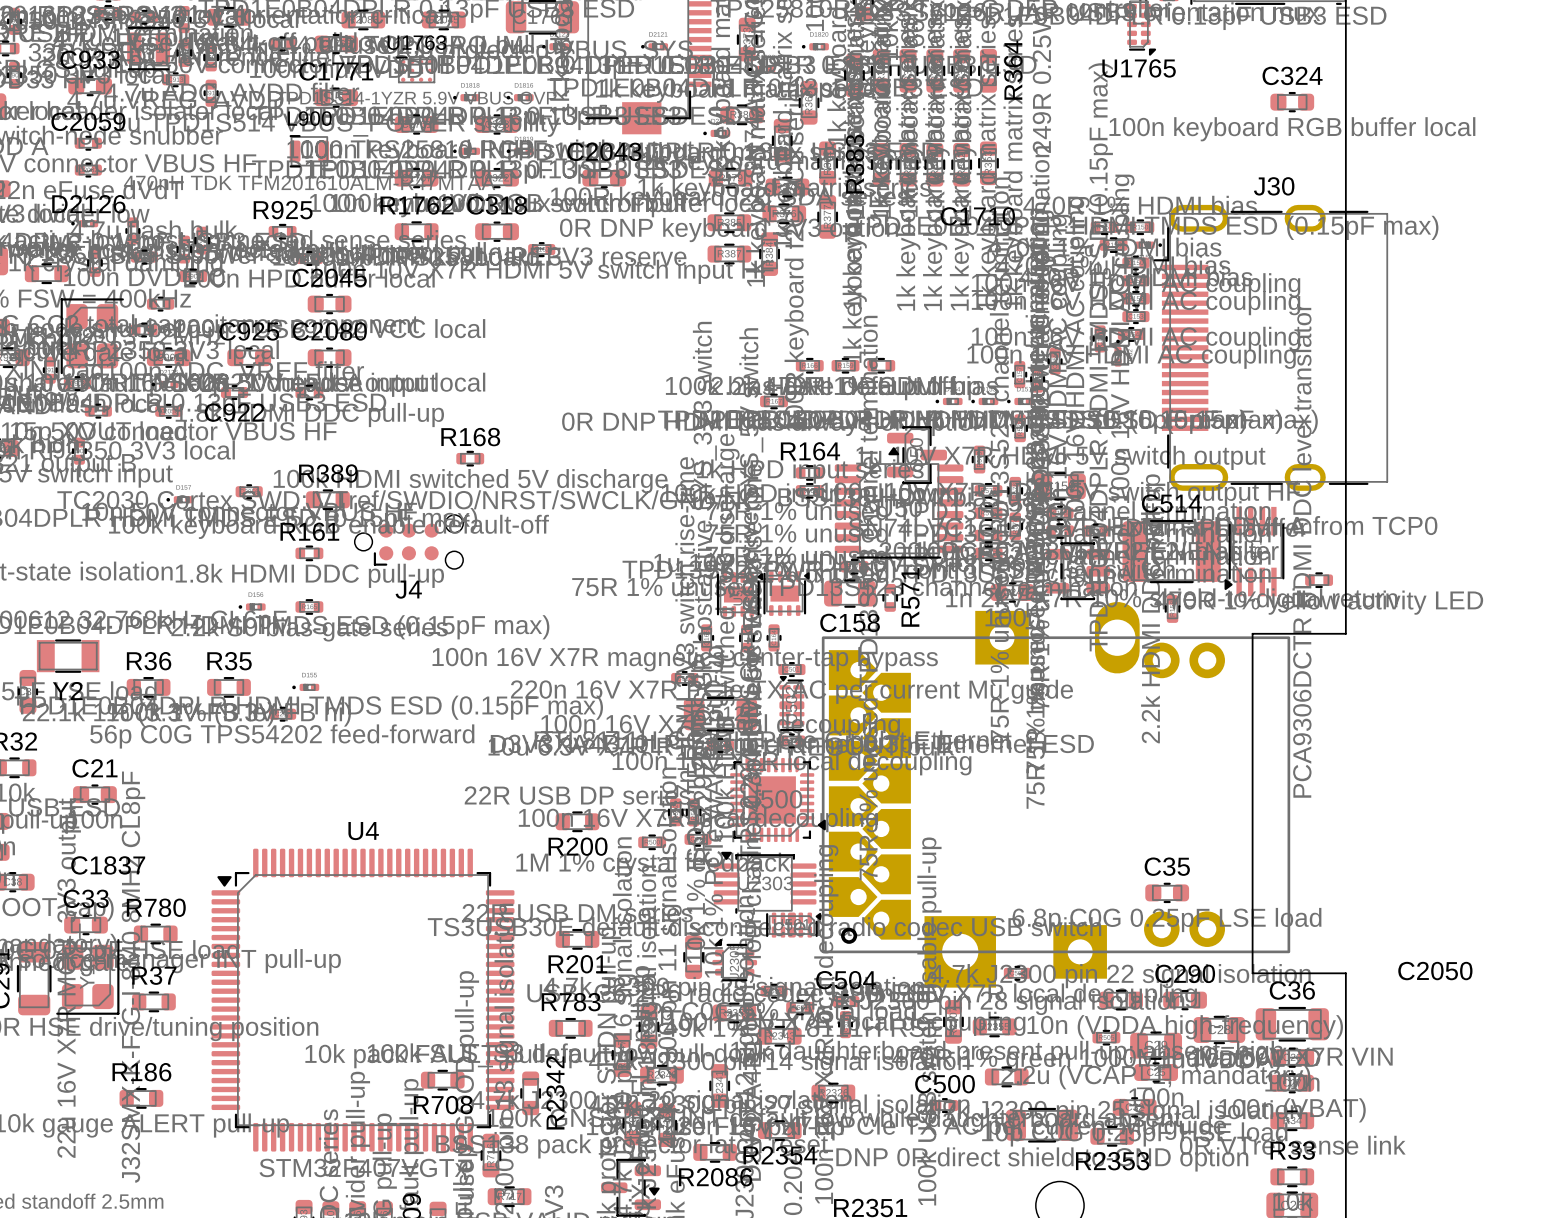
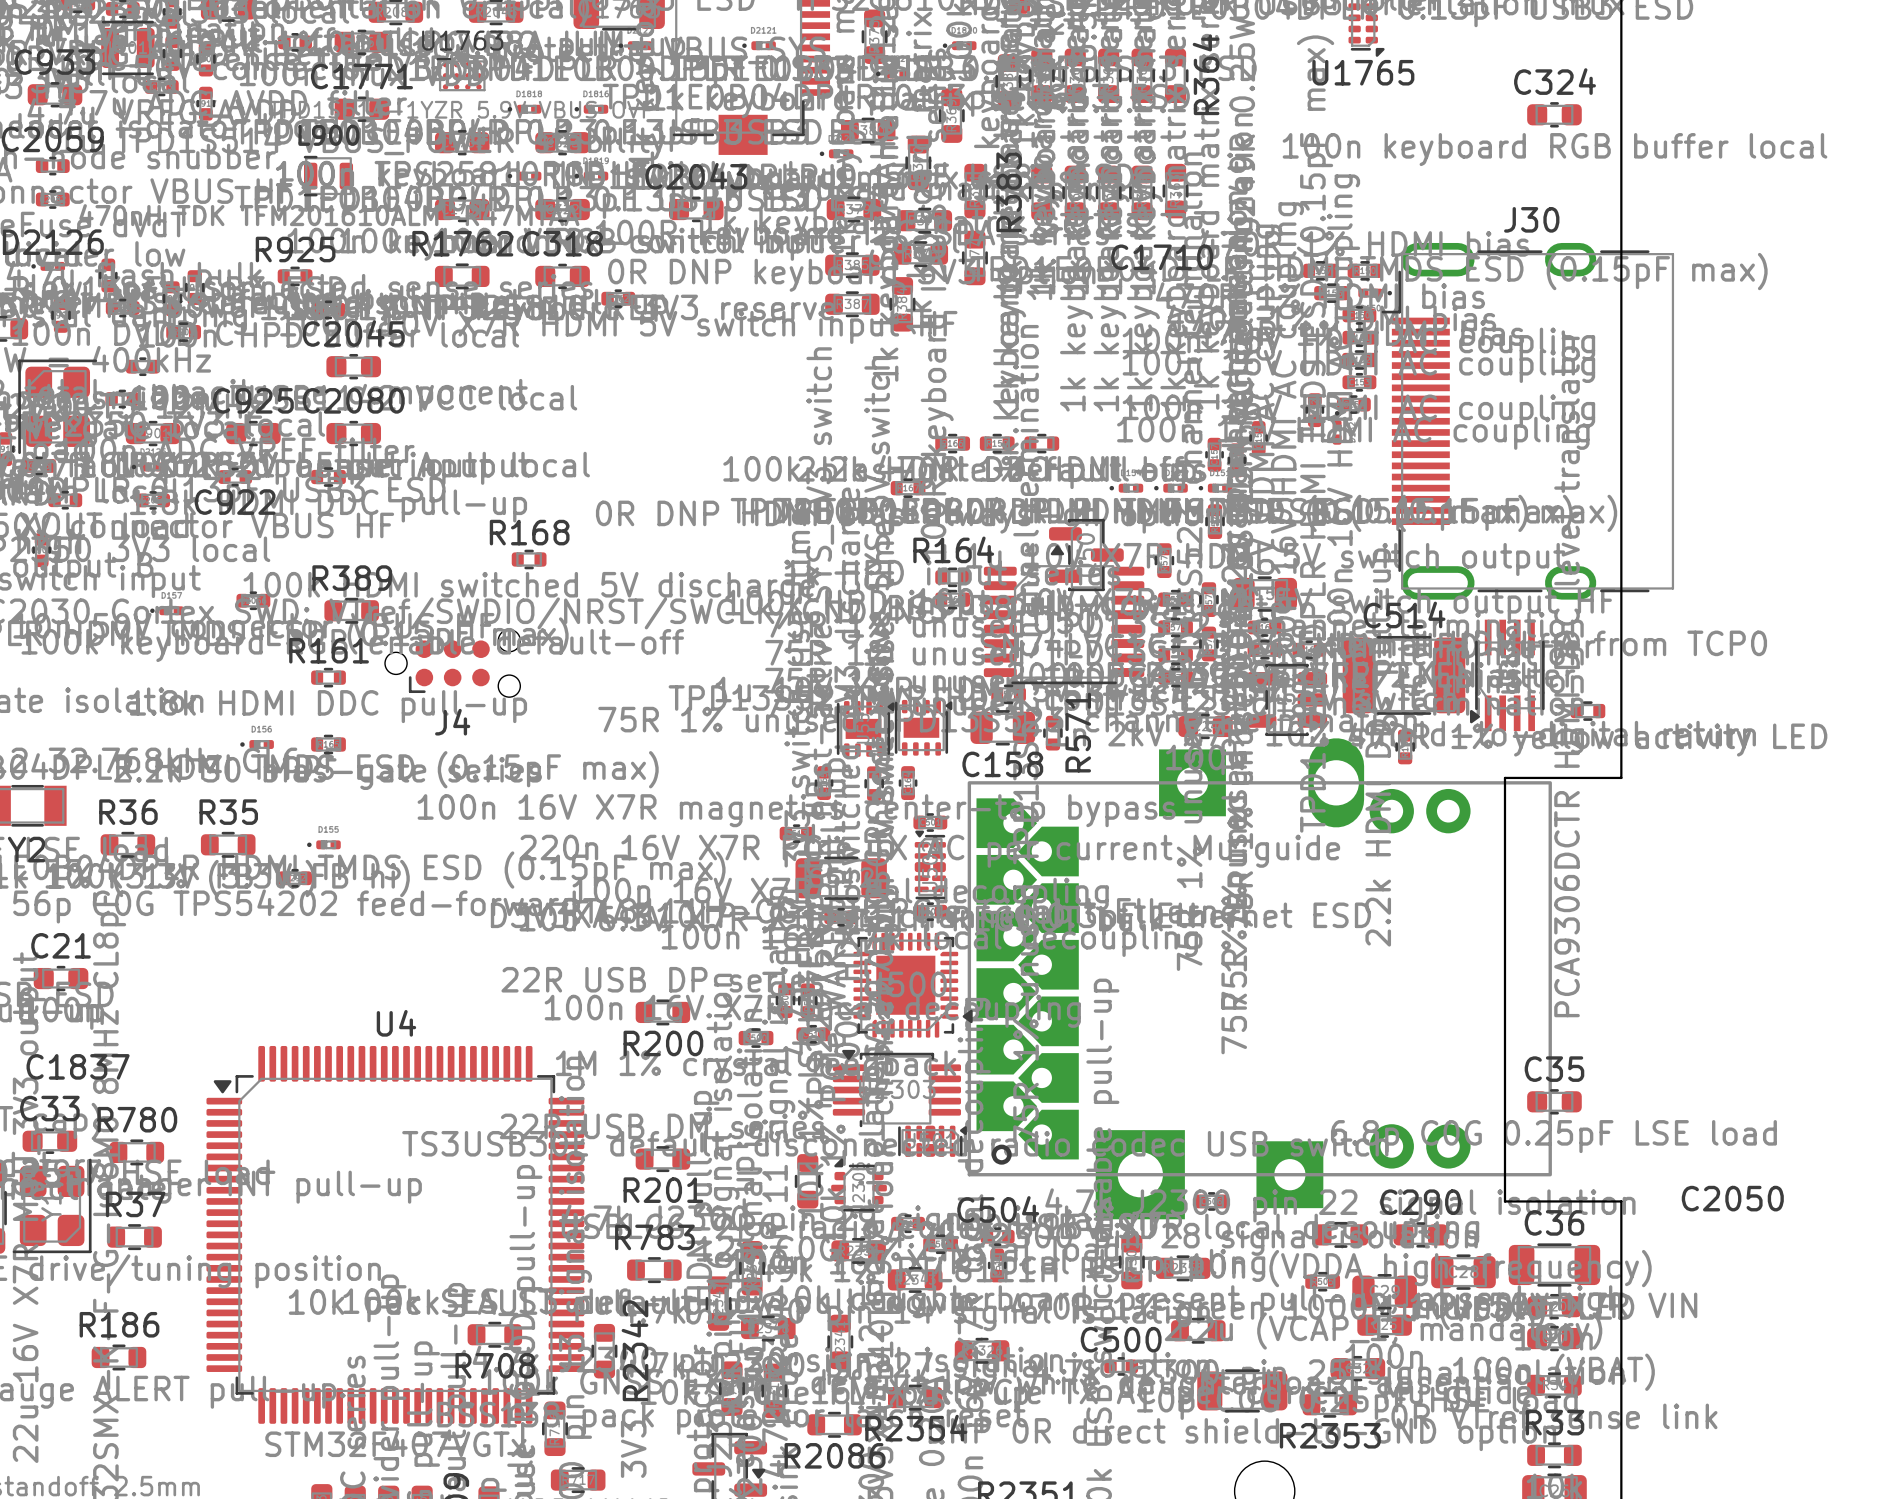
C35 position: (1167, 892) -> (1554, 1101)

